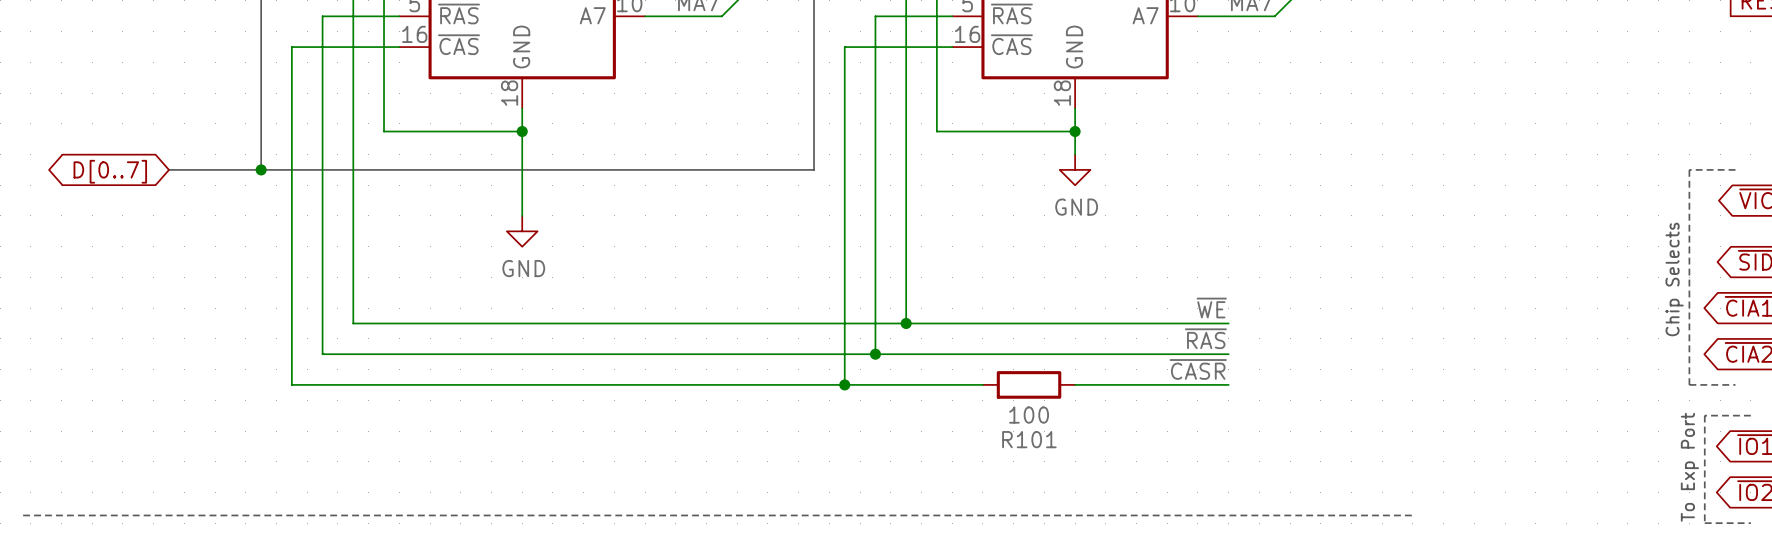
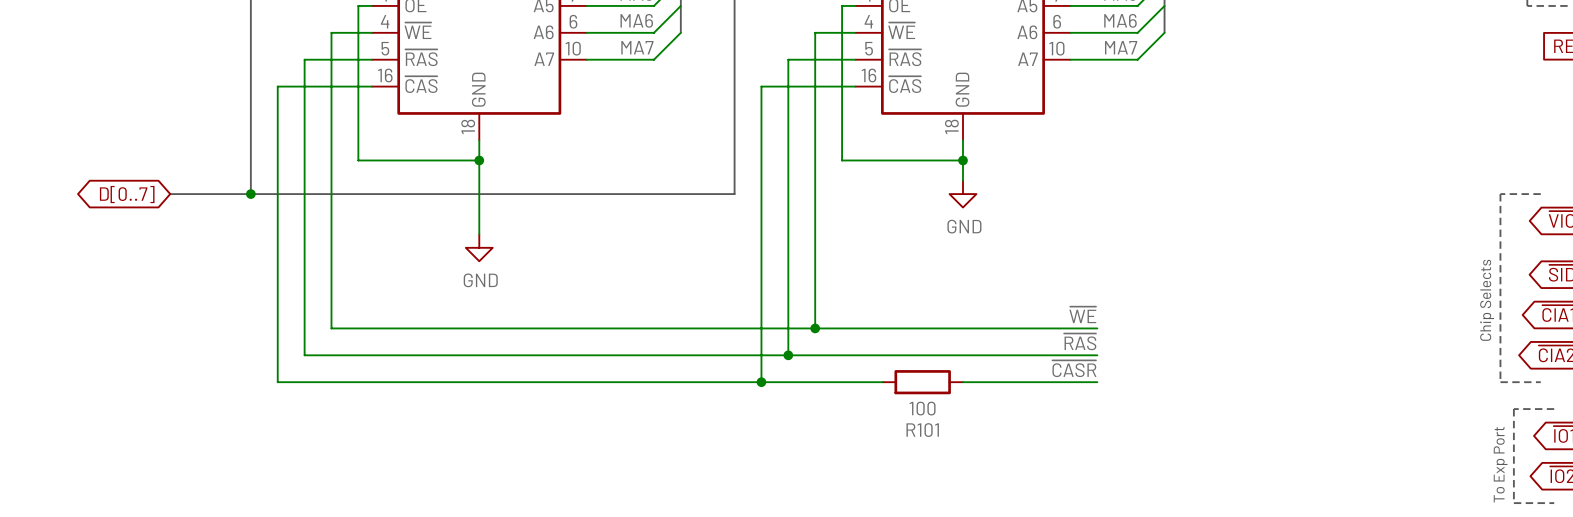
line: (23, 515) (1412, 515) -> none

